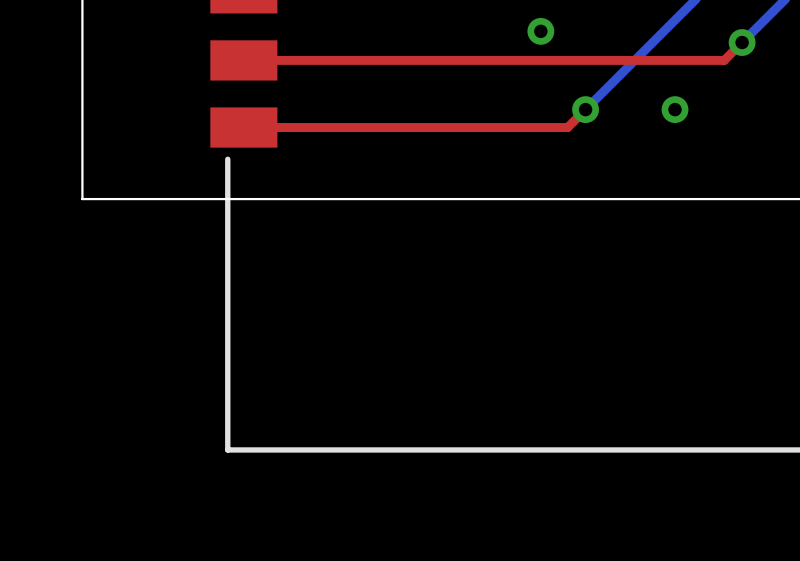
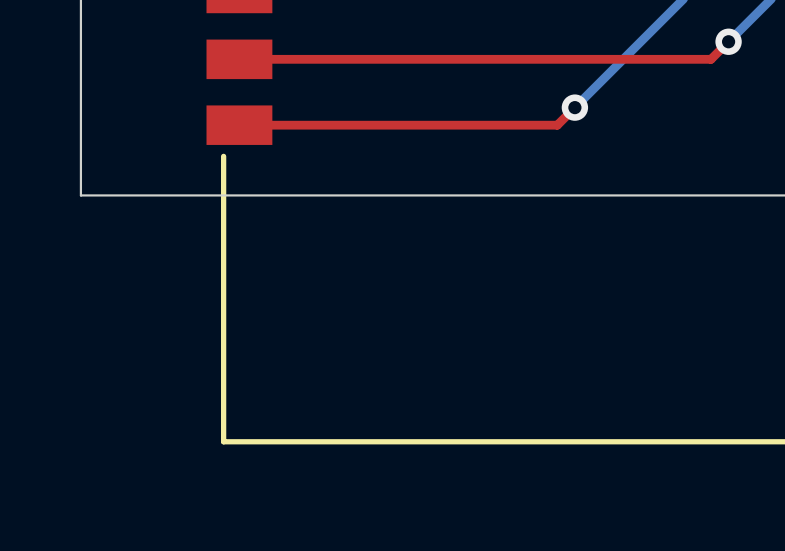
via: (540, 31) -> none
via: (675, 109) -> none

